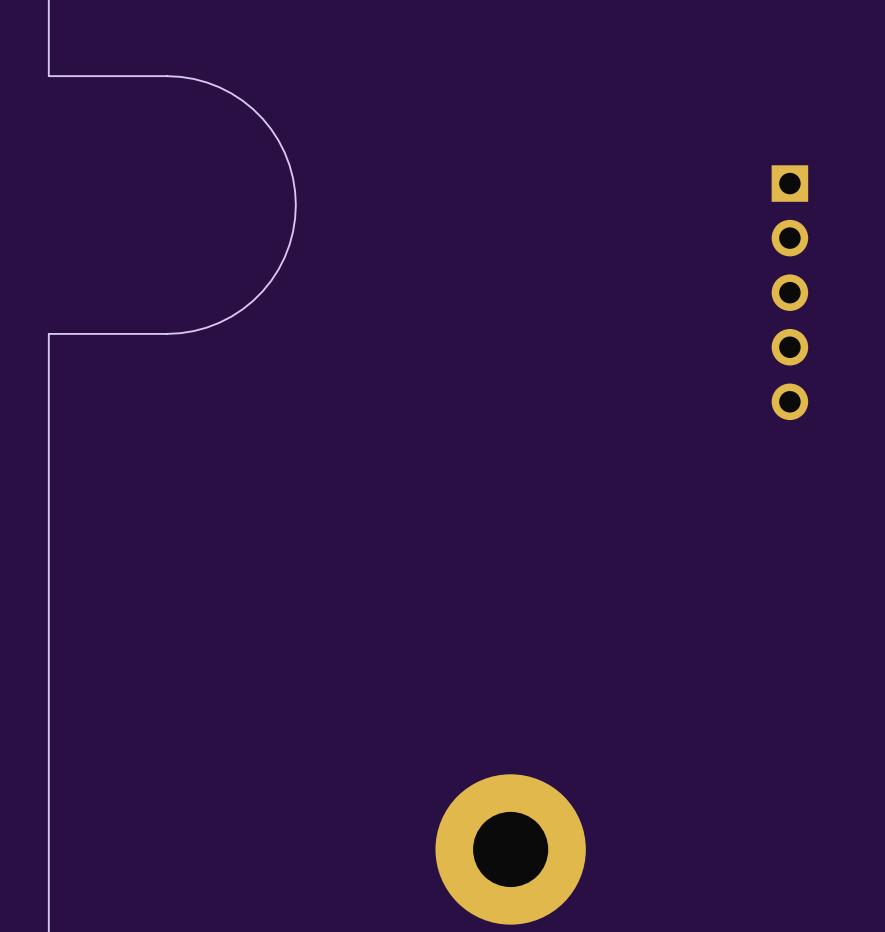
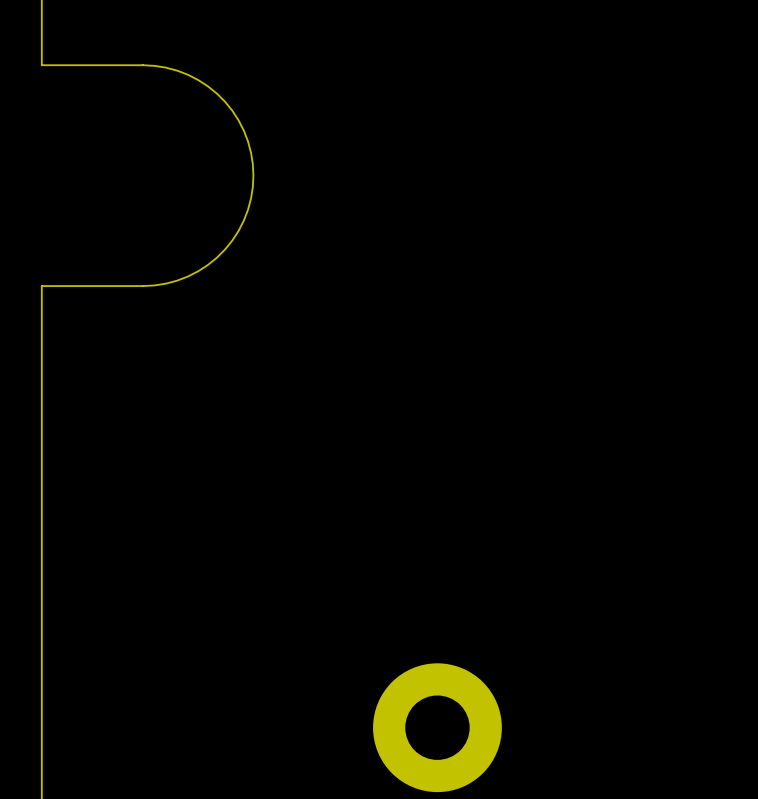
part: (789, 292) -> none

